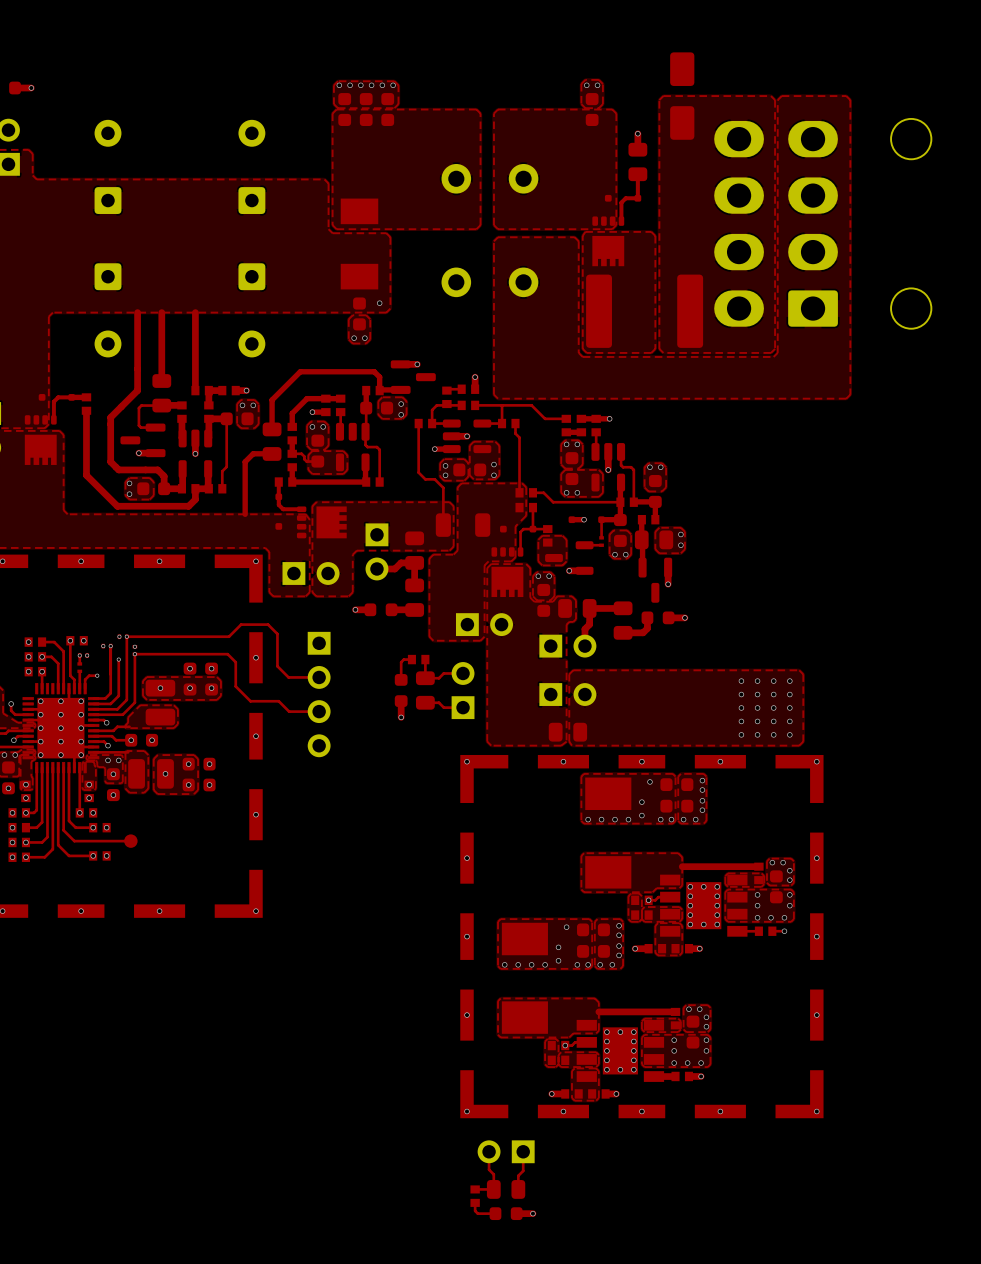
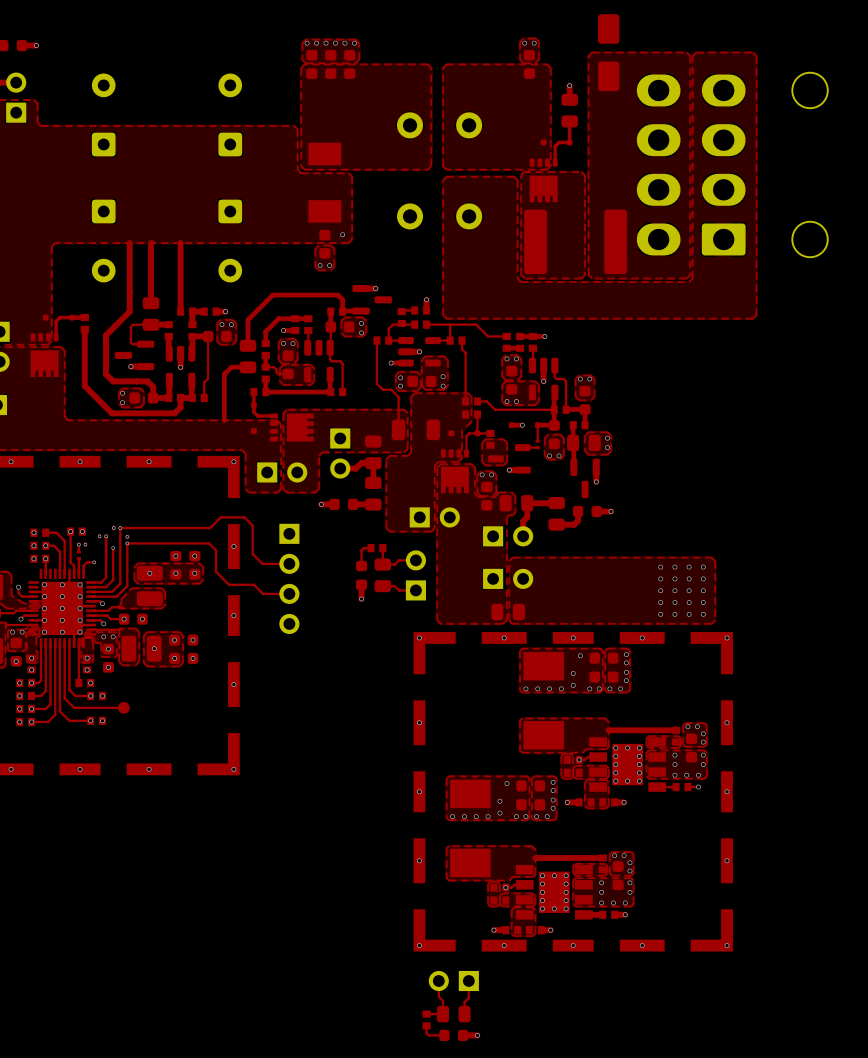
via: (79, 812) -> none

